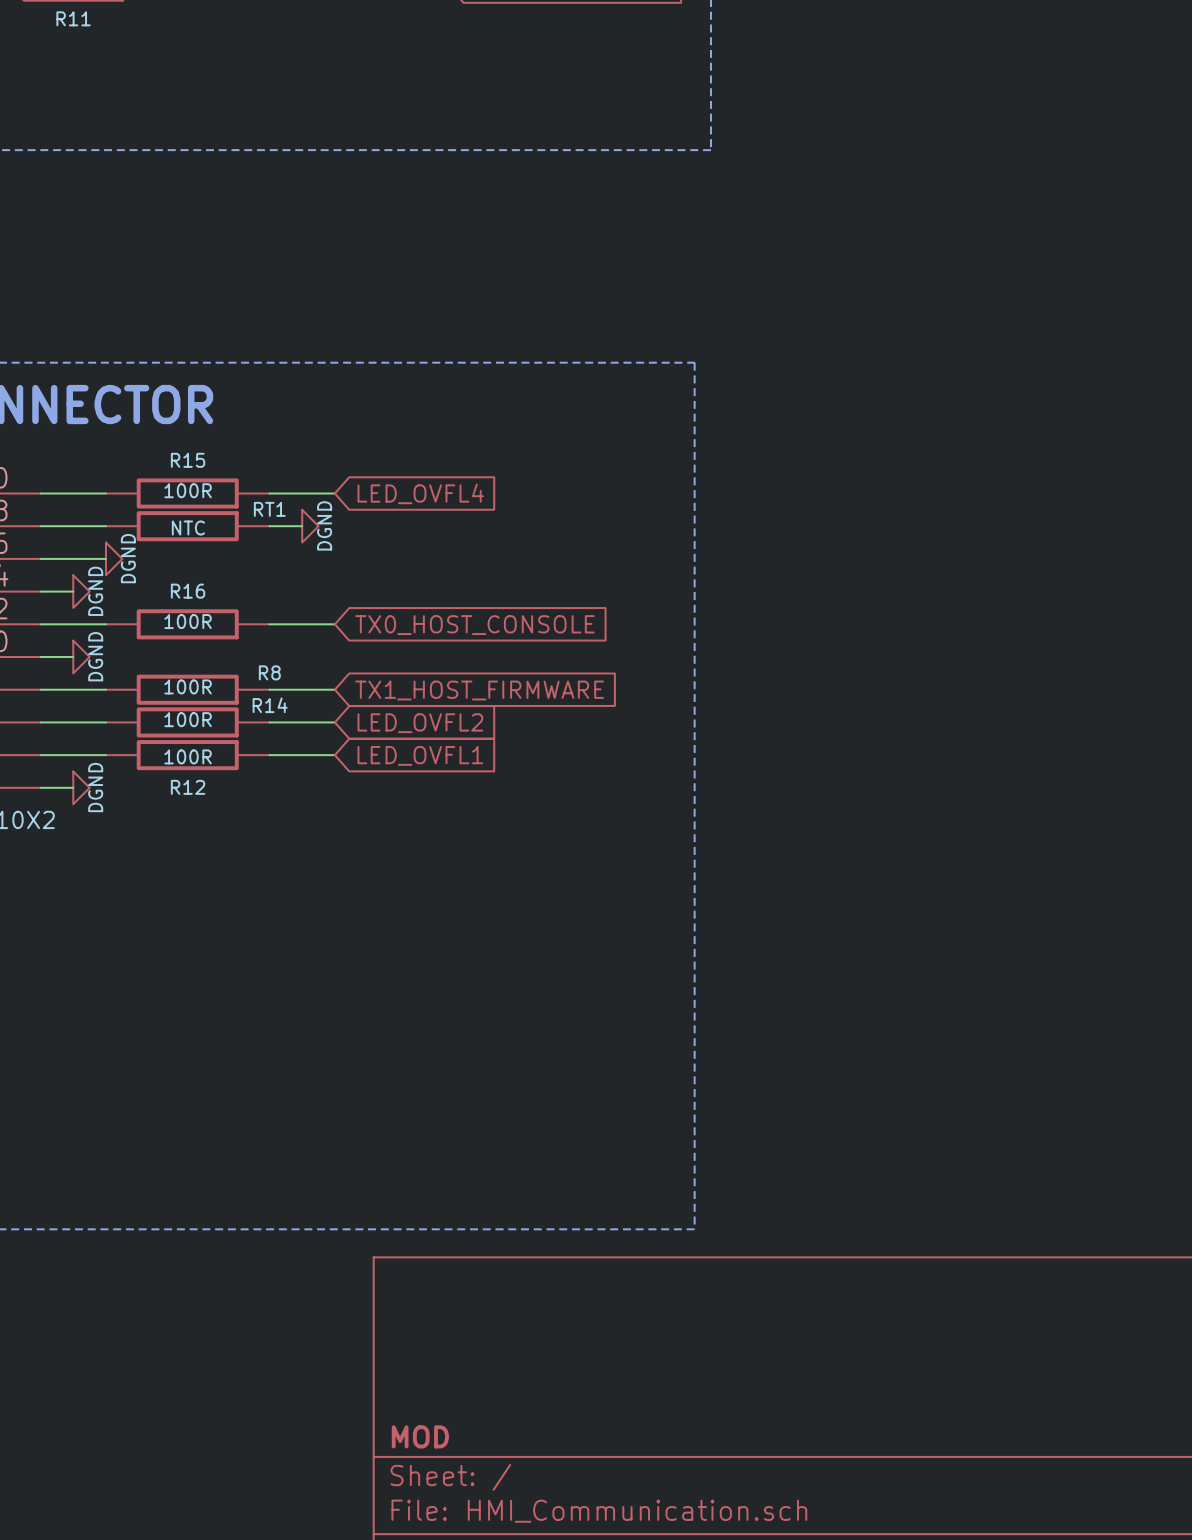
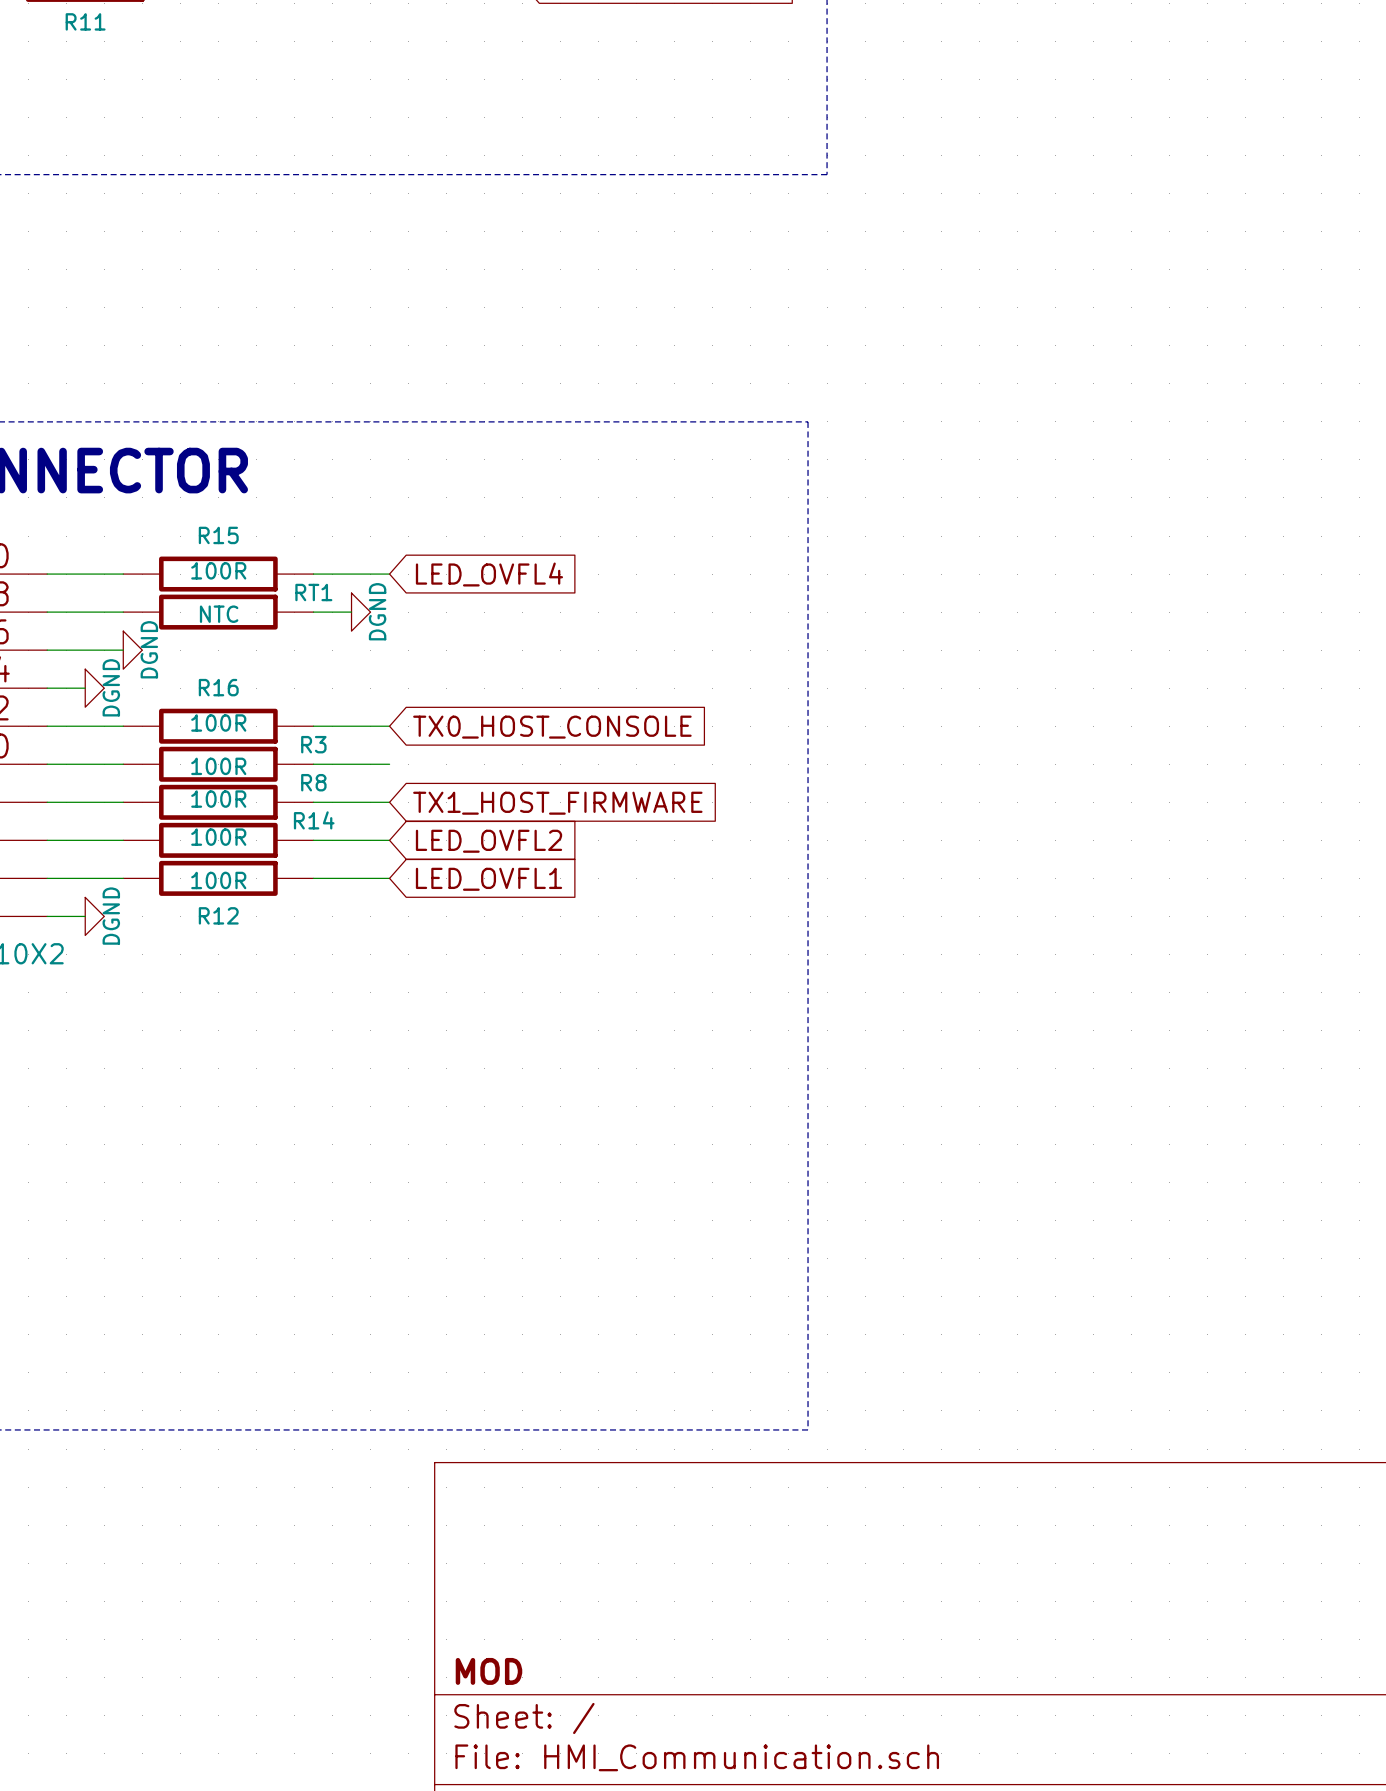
wire: none -> (85, 764) (123, 764)
power symbol: DGND (81, 657) -> none
R3: none -> 100R (218, 764)
wire: none -> (313, 764) (389, 764)

